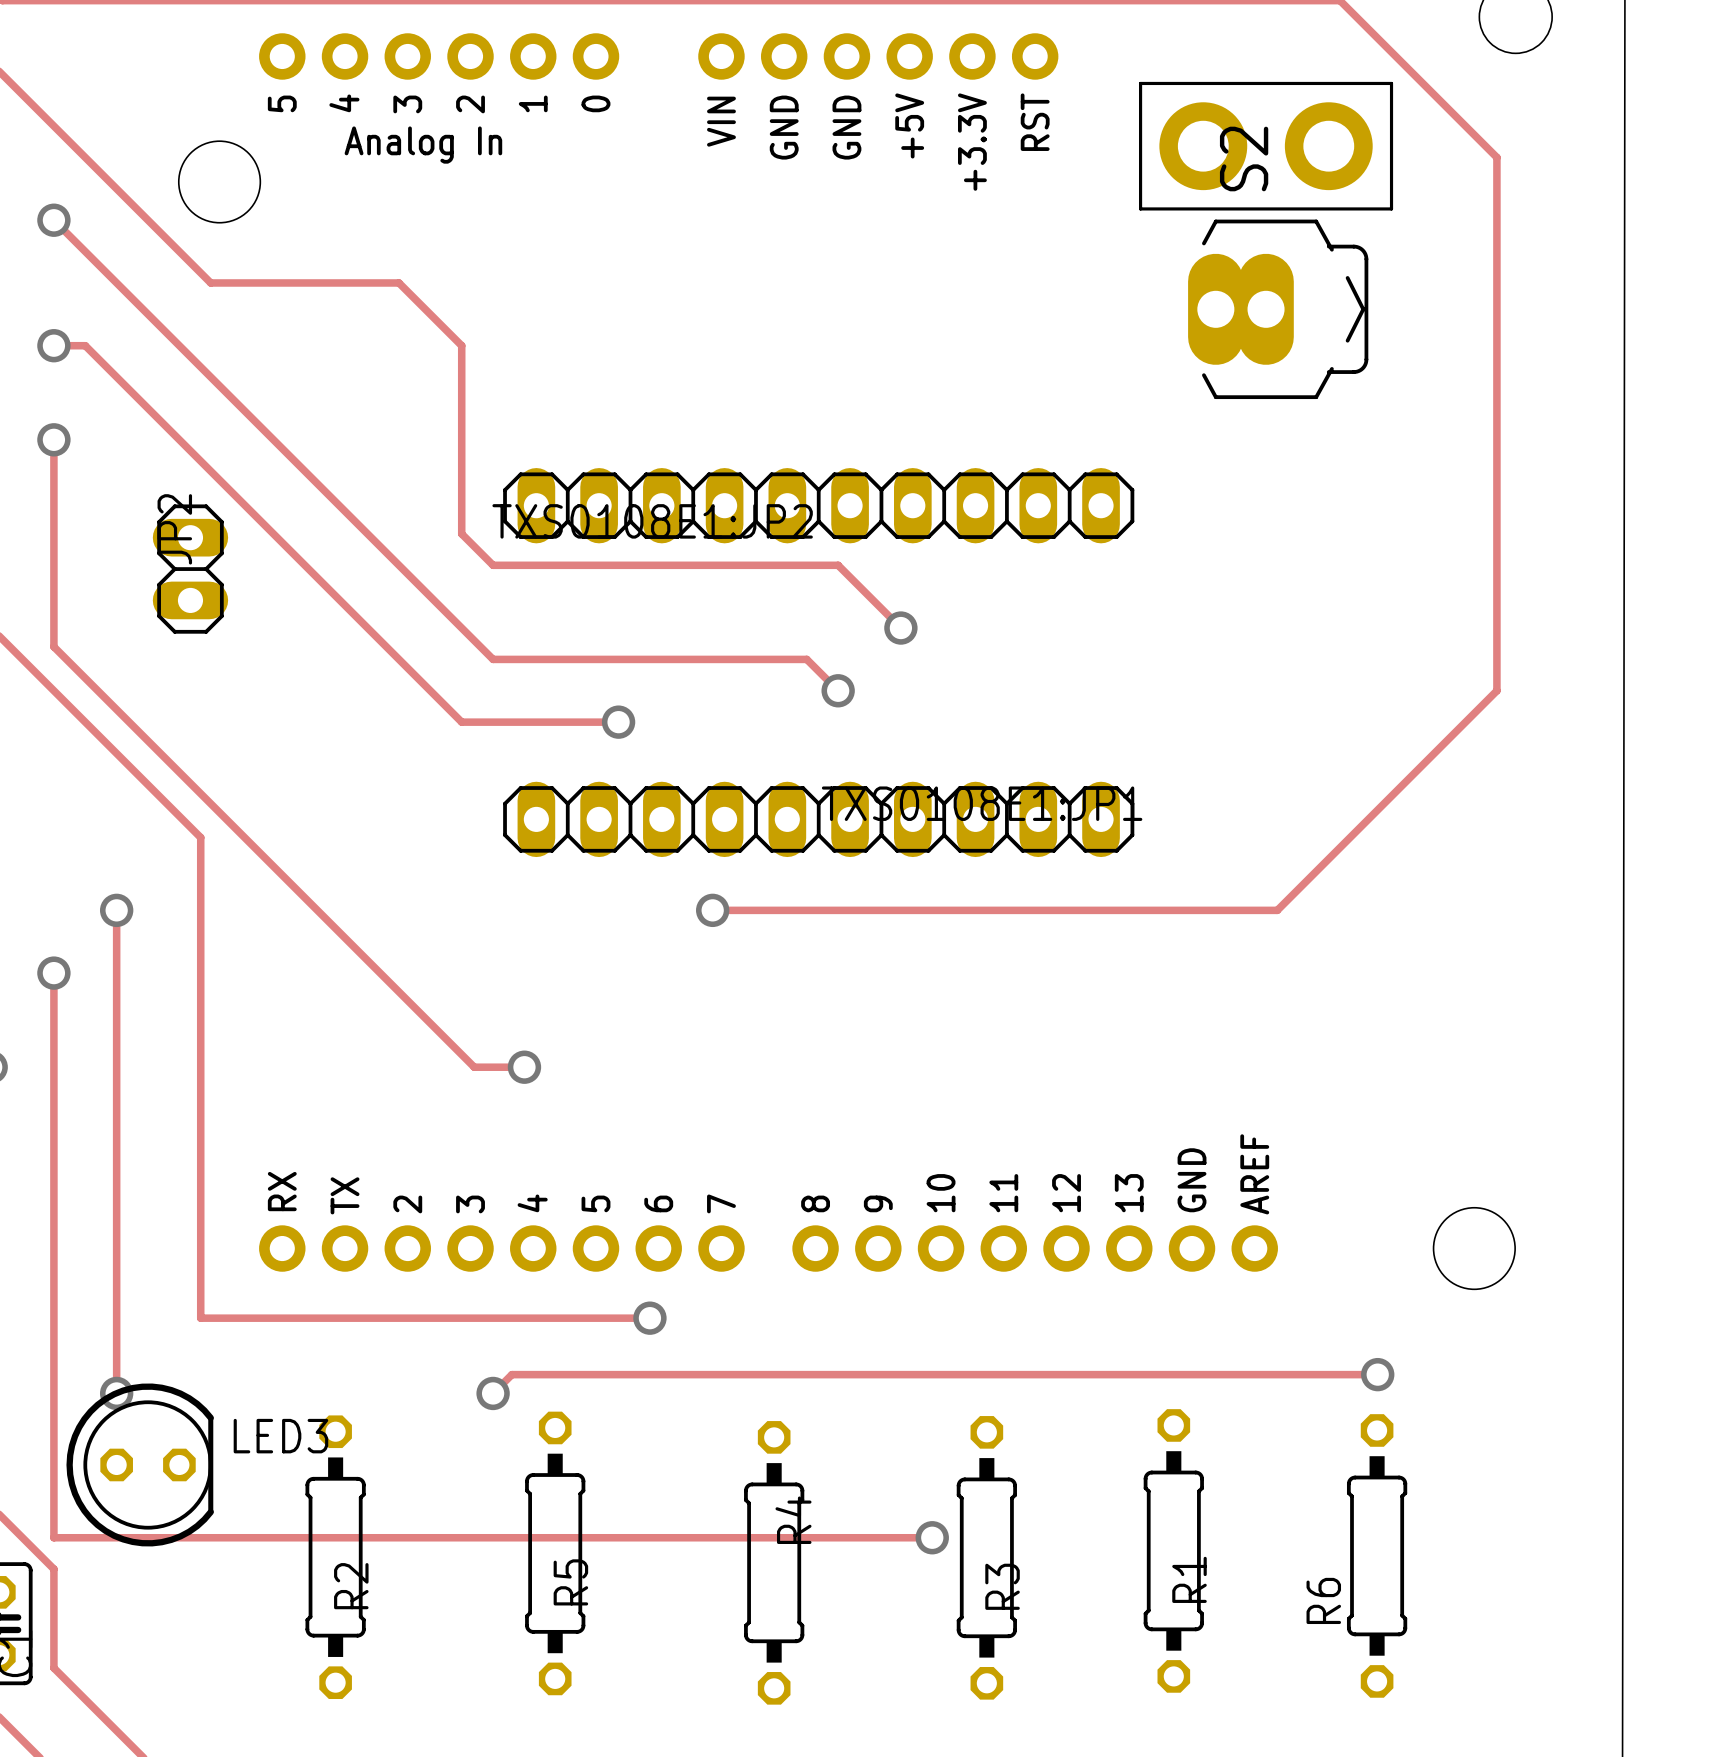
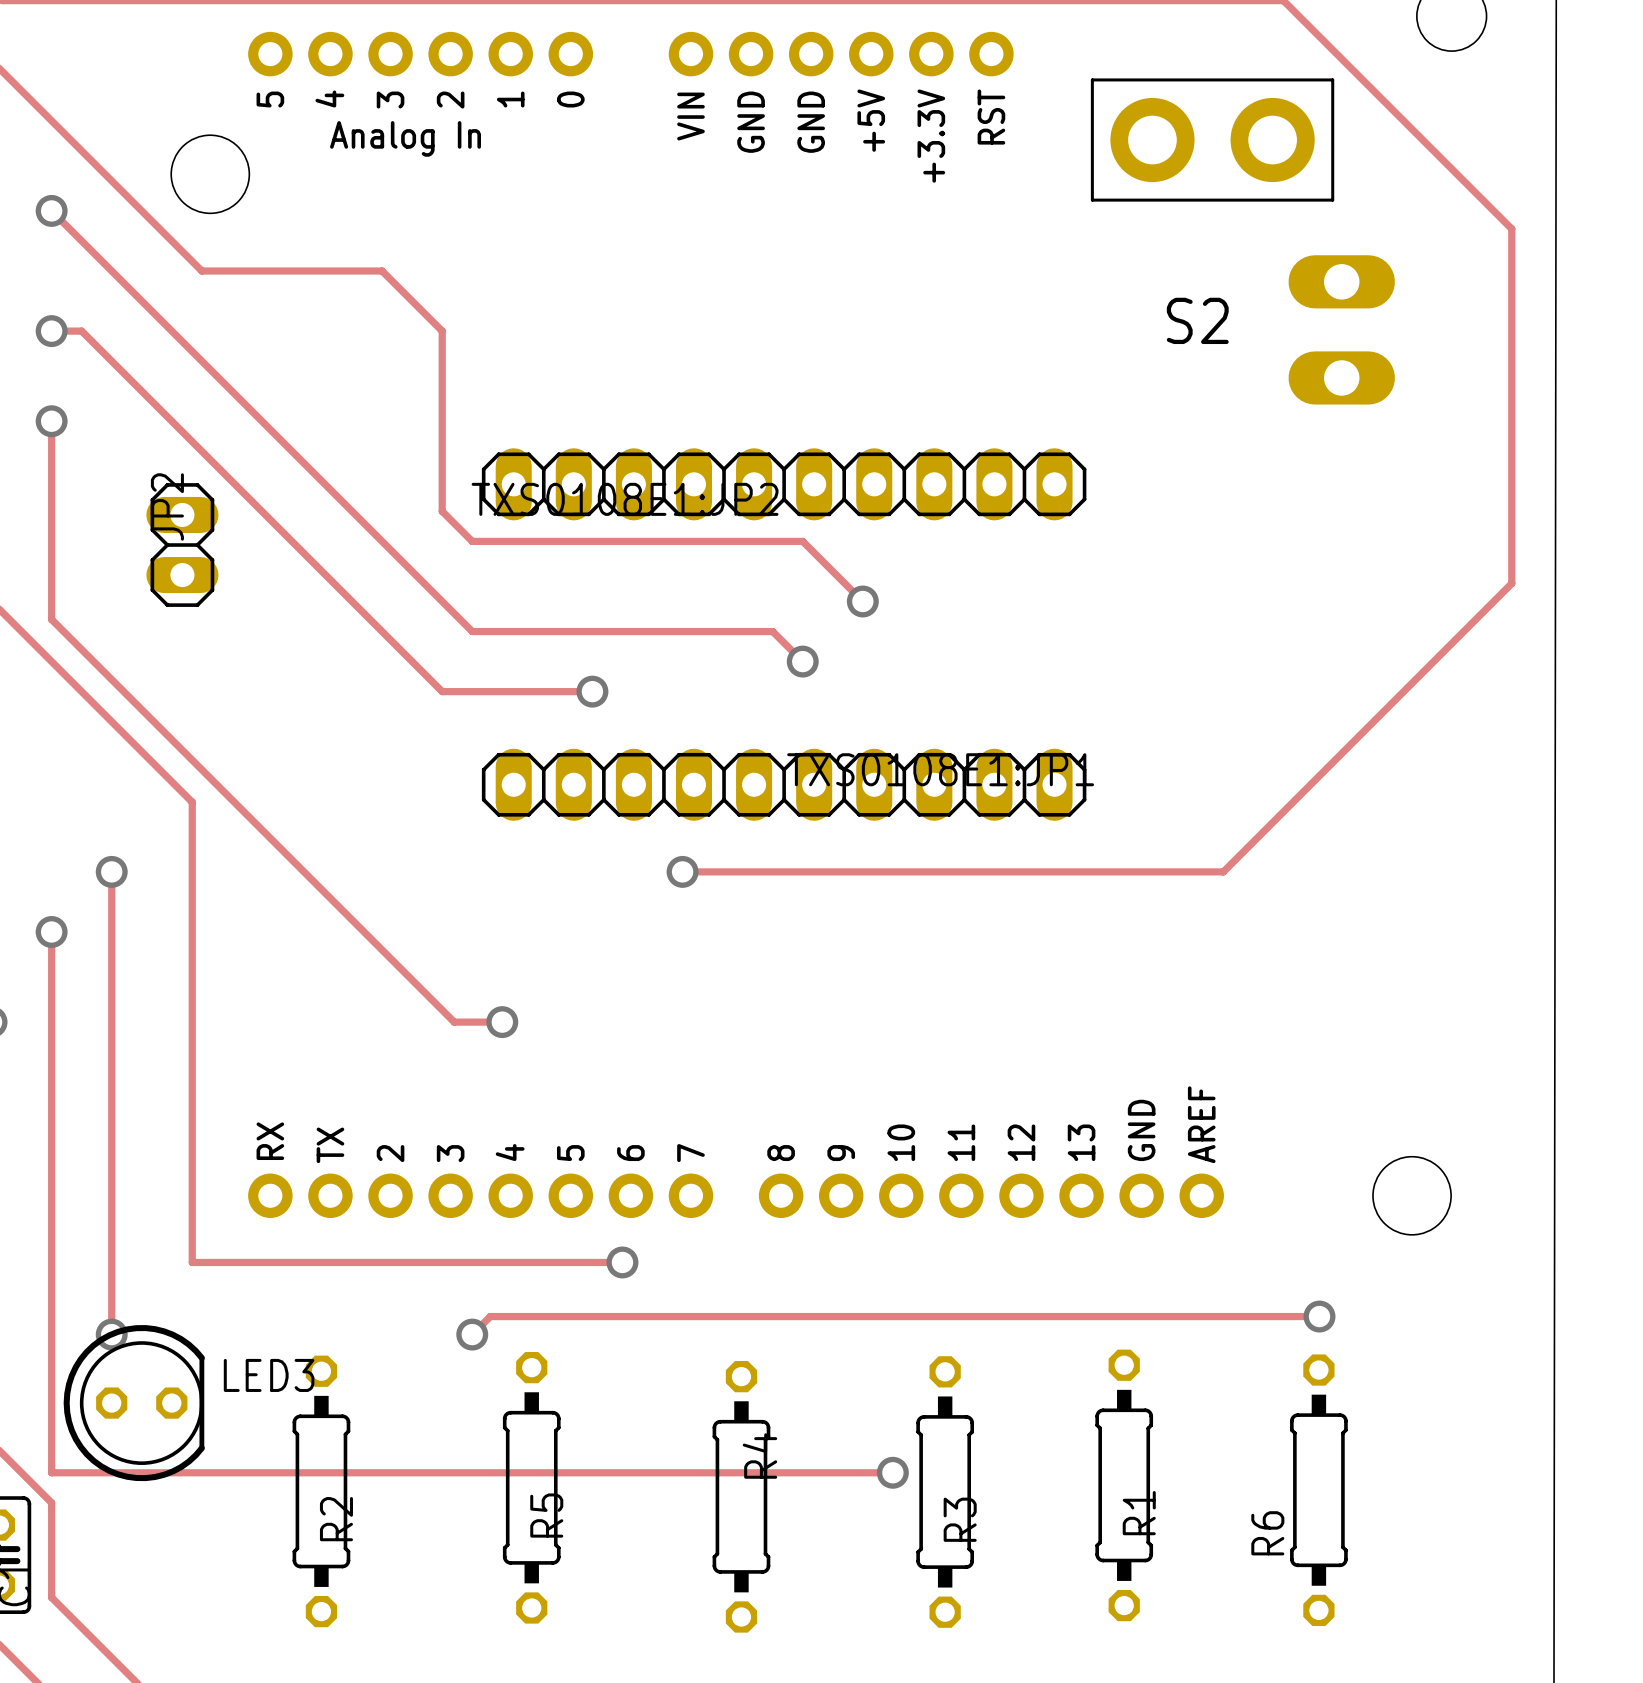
track: (1496, 157) (1496, 690) -> (1433, 150) (1511, 228) (1511, 583) (1433, 661)
S2 name position: S2 (1244, 159) -> S2 (1197, 320)
S2 footprint: [1188, 219, 1369, 400] -> [1288, 255, 1395, 405]

